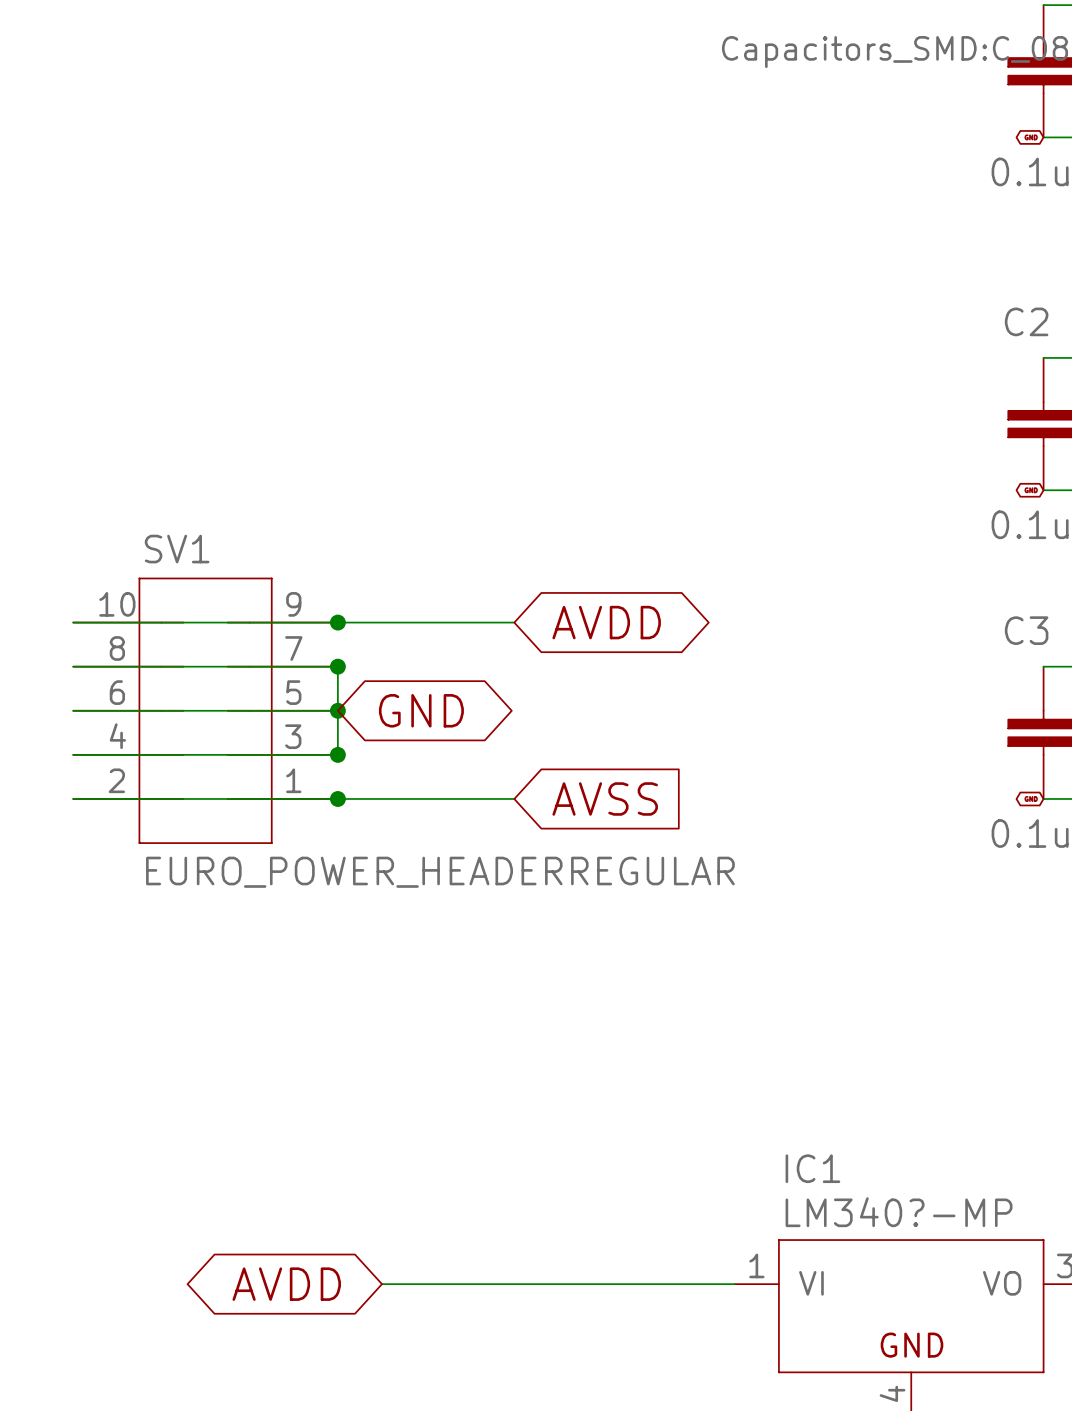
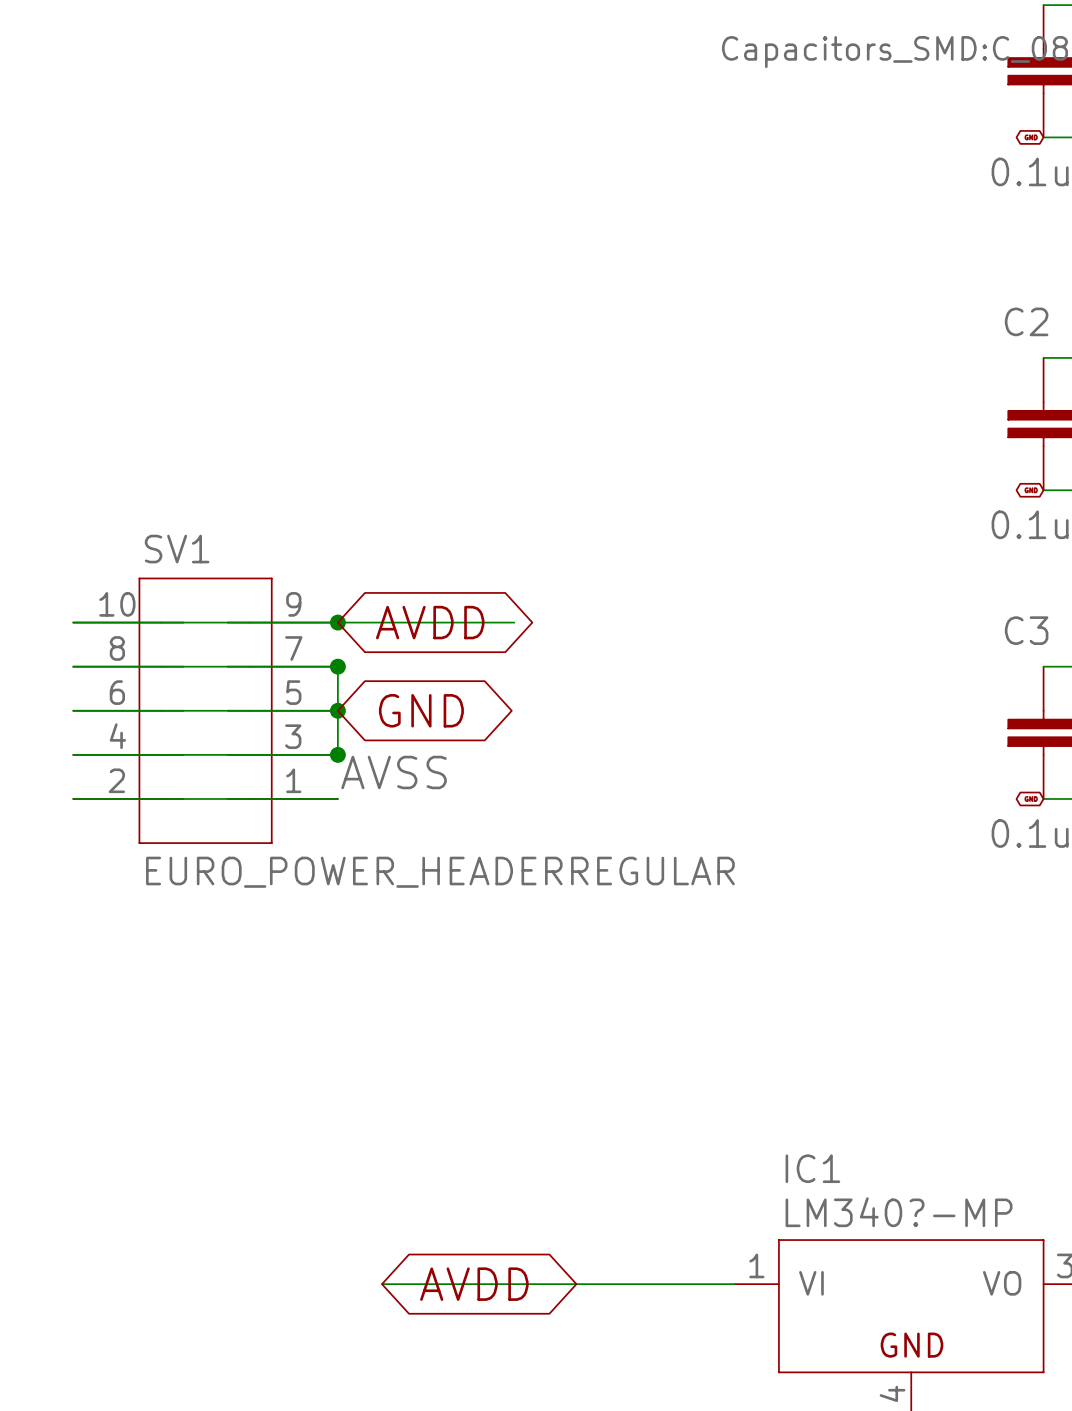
global label position: AVDD (606, 622) -> AVDD (430, 622)
label: none -> AVSS (394, 772)
wire: (337, 798) (514, 798) -> none
junction: (337, 798) -> none
global label: AVSS (605, 798) -> none
global label rotation: 0° (286, 1284) -> 180° (474, 1284)
global label position: AVDD (286, 1284) -> AVDD (474, 1284)

